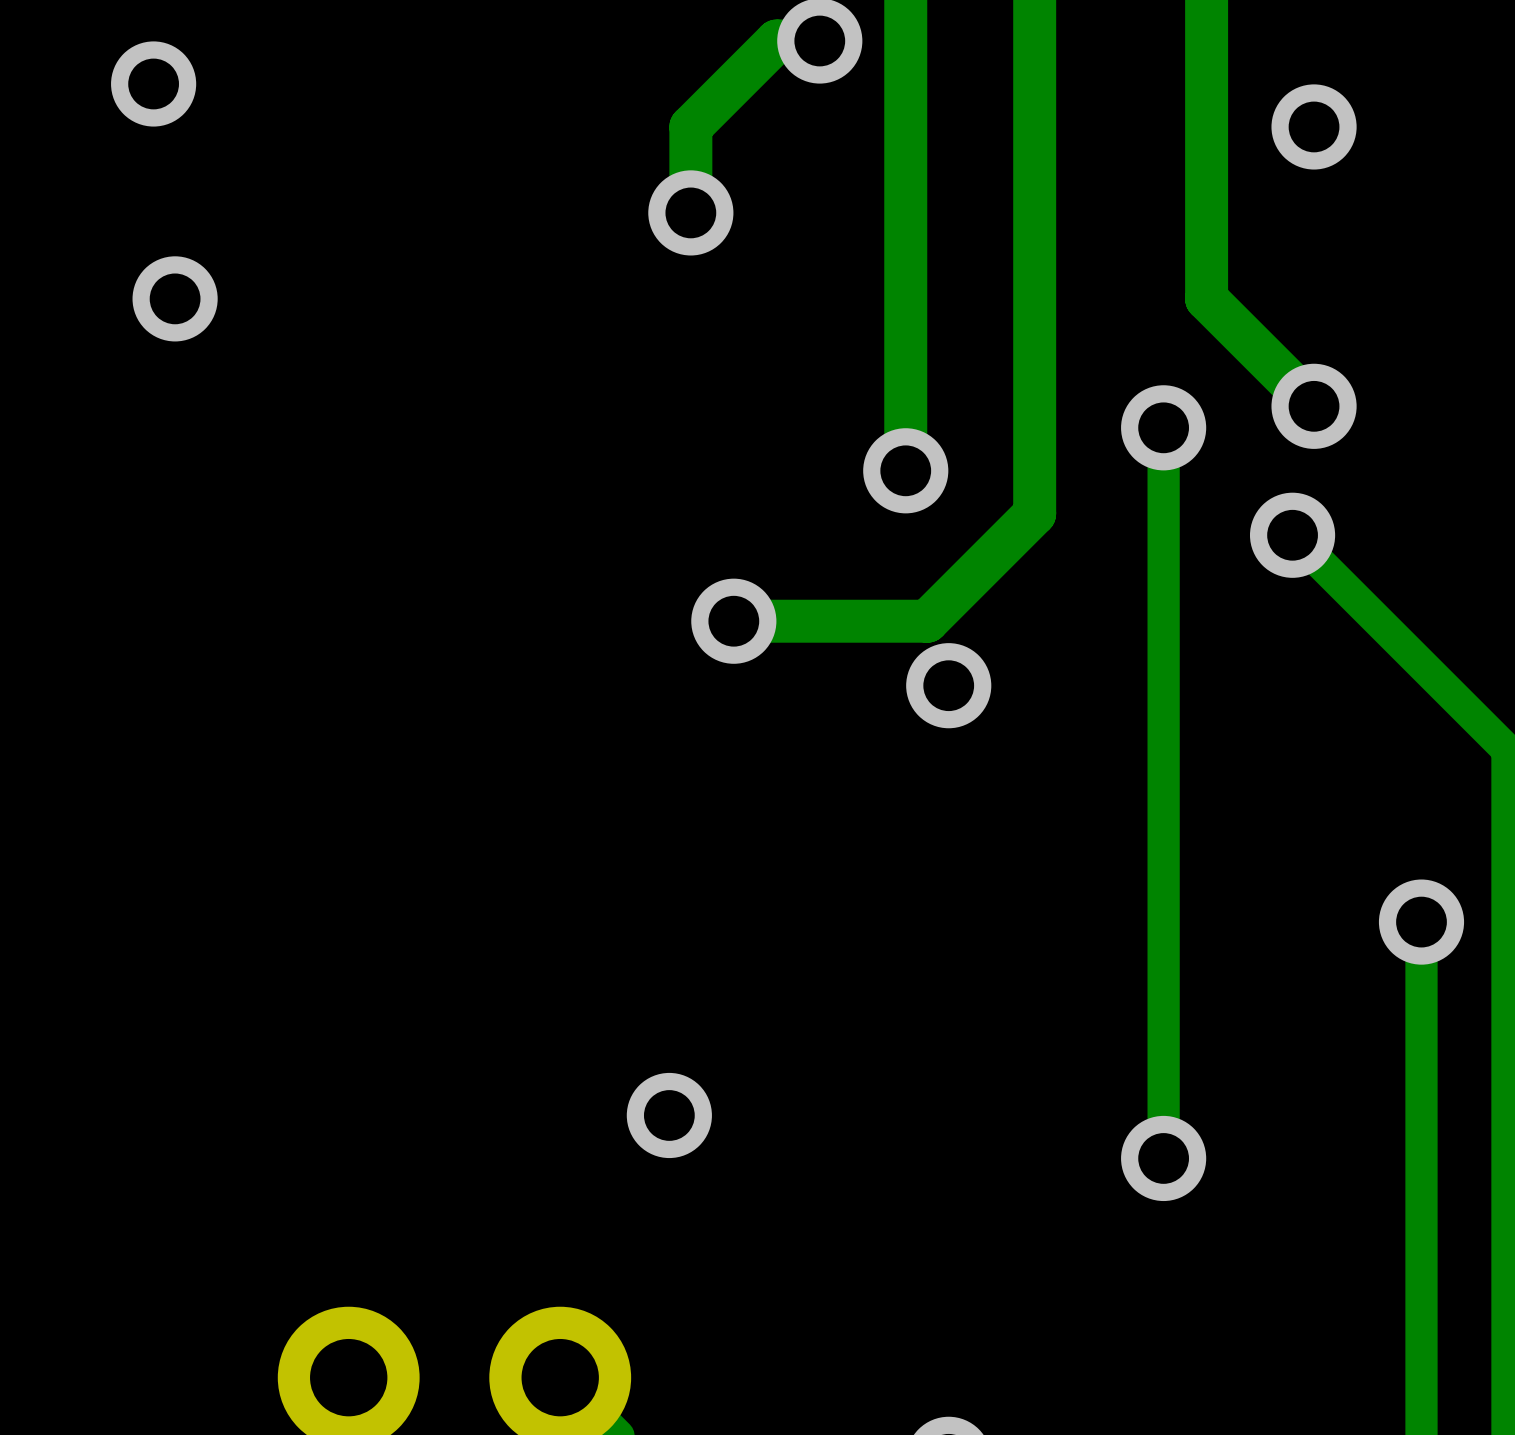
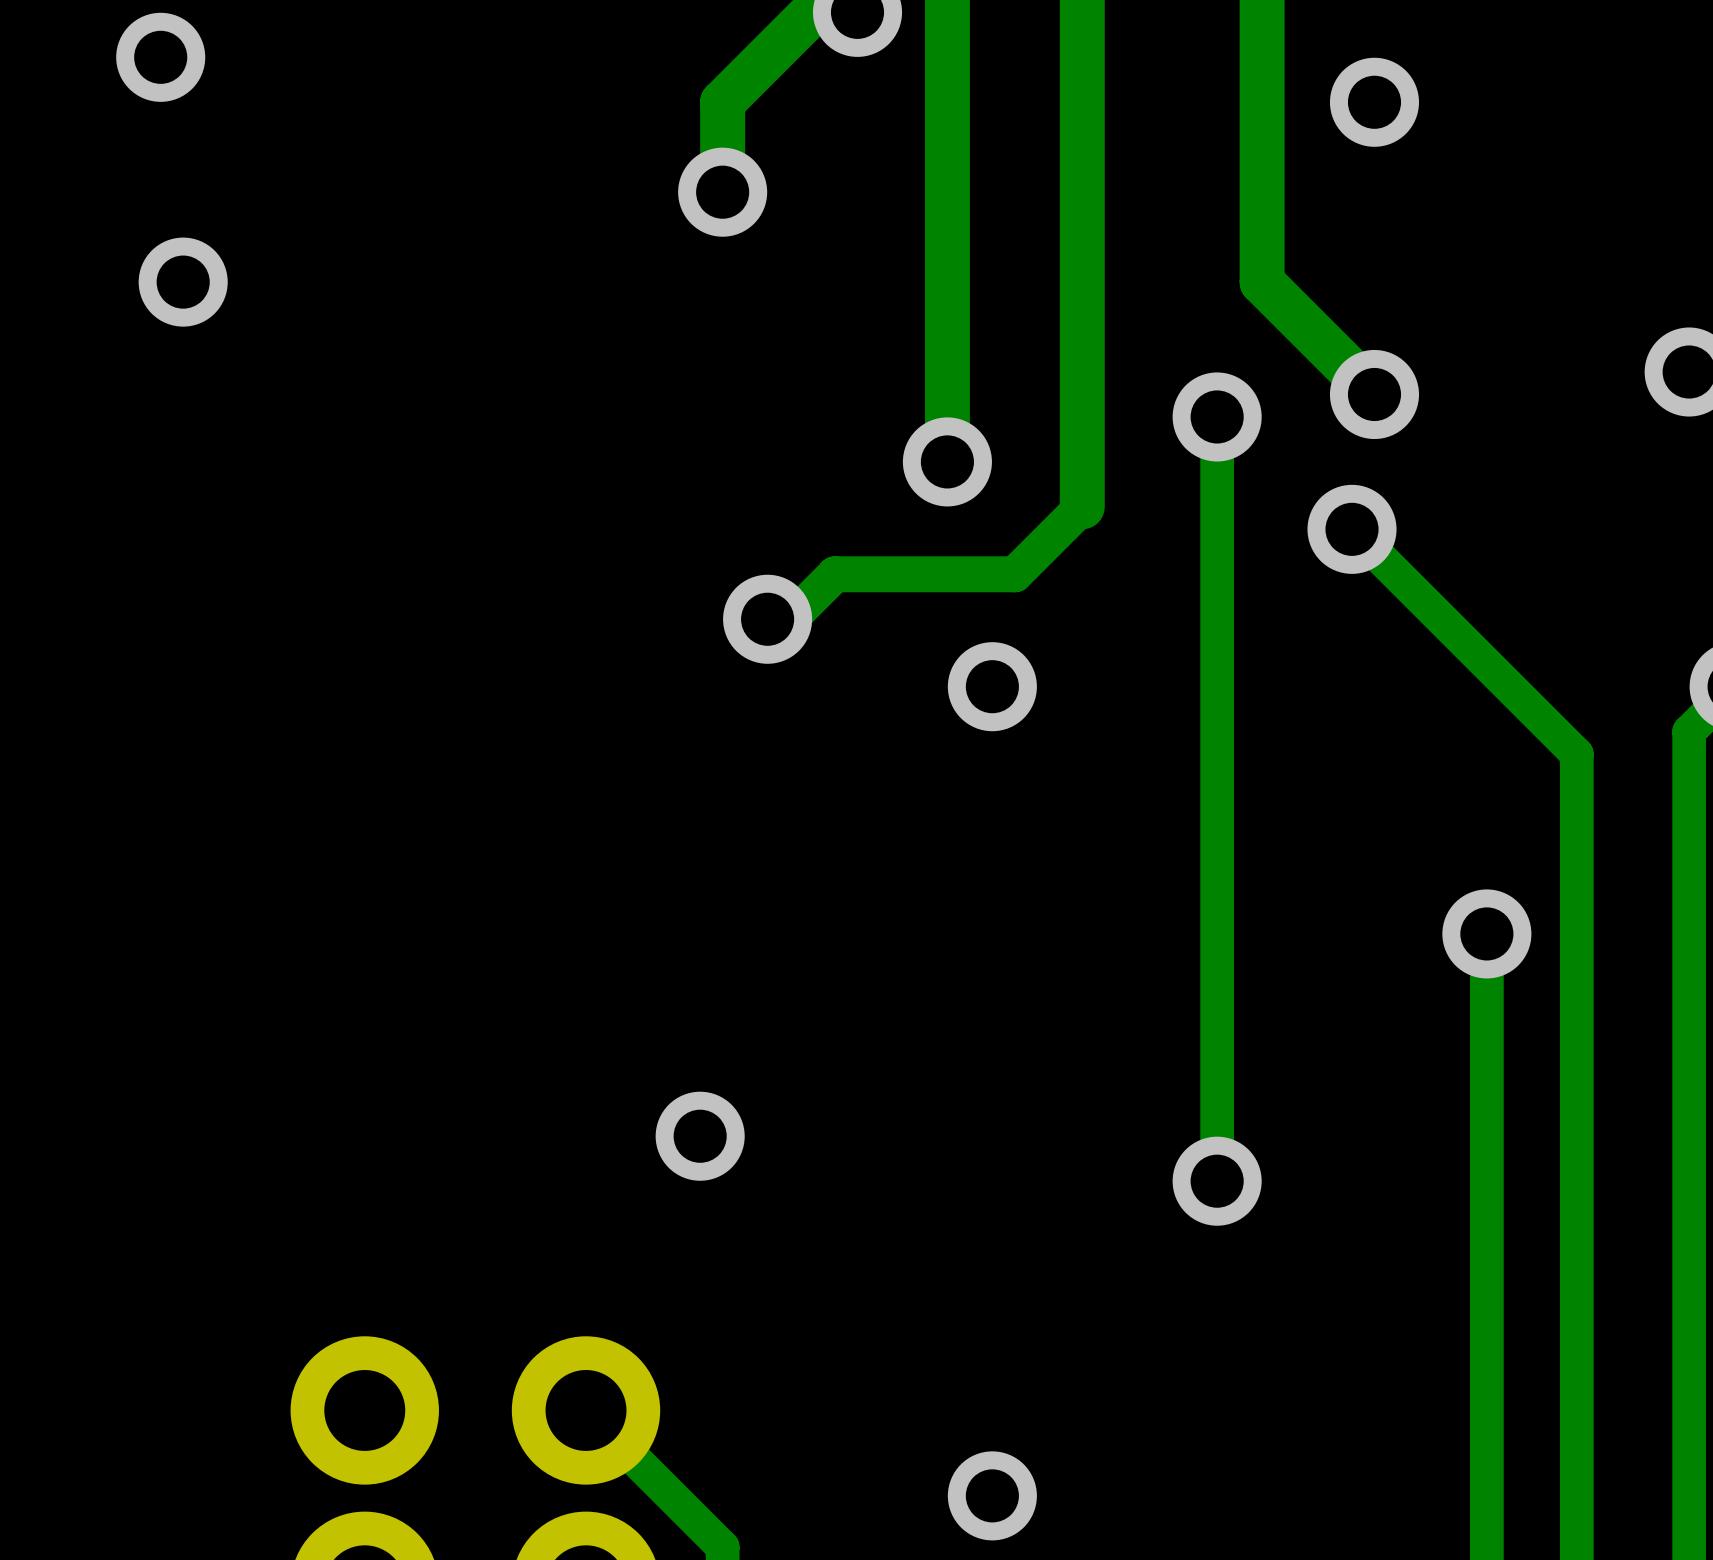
track width: thick (1034, 513) (970, 578) -> thin (1082, 506) (1014, 574)
track: (970, 578) (927, 621) (755, 621) -> (1014, 574) (835, 574) (790, 619)

